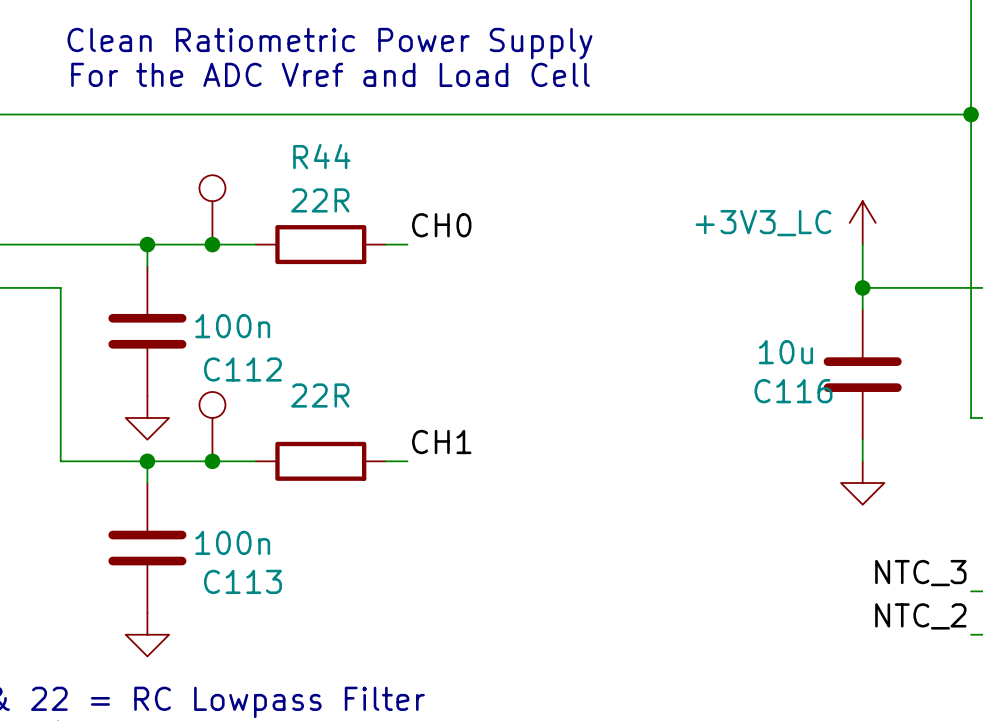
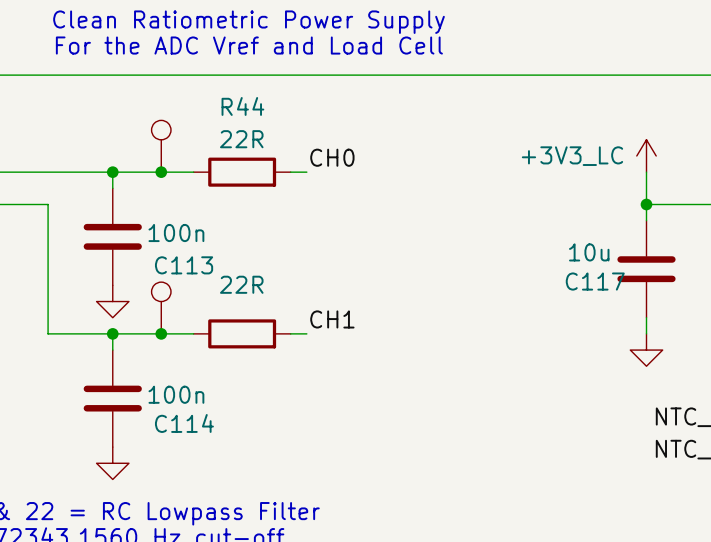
C112 name: C112 (242, 369) -> C113 (184, 265)
C116 name: C116 (793, 391) -> C117 (595, 281)
C113 name: C113 (242, 581) -> C114 (184, 423)

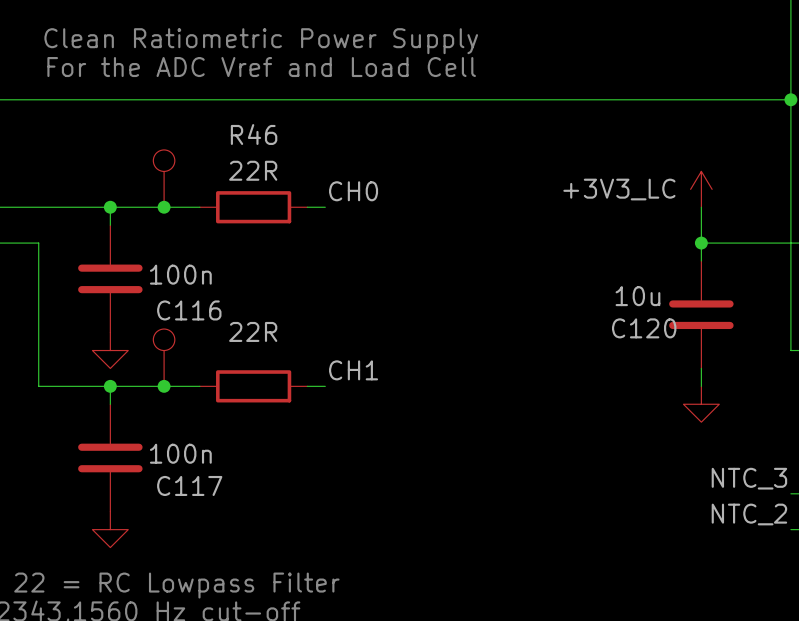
R44 name: R44 (242, 106) -> R46 (254, 134)
C113 name: C113 (184, 265) -> C116 (189, 310)
C117 name: C117 (595, 281) -> C120 (644, 328)
C114 name: C114 (184, 423) -> C117 (189, 485)

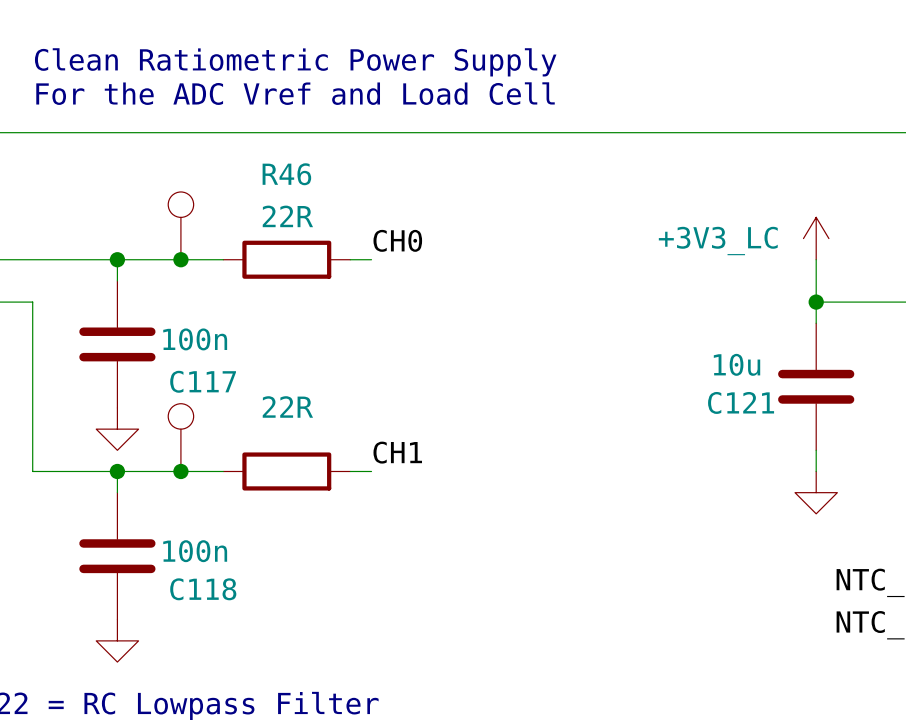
C116 name: C116 (189, 310) -> C117 (203, 381)
C120 name: C120 (644, 328) -> C121 (741, 402)
C117 name: C117 (189, 485) -> C118 (203, 589)

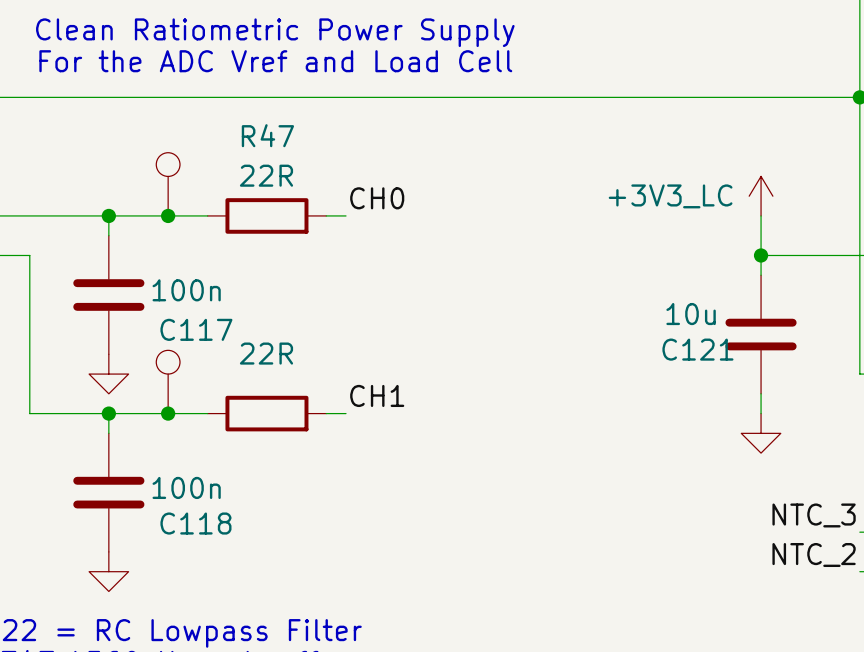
R46 name: R46 (286, 174) -> R47 (267, 135)

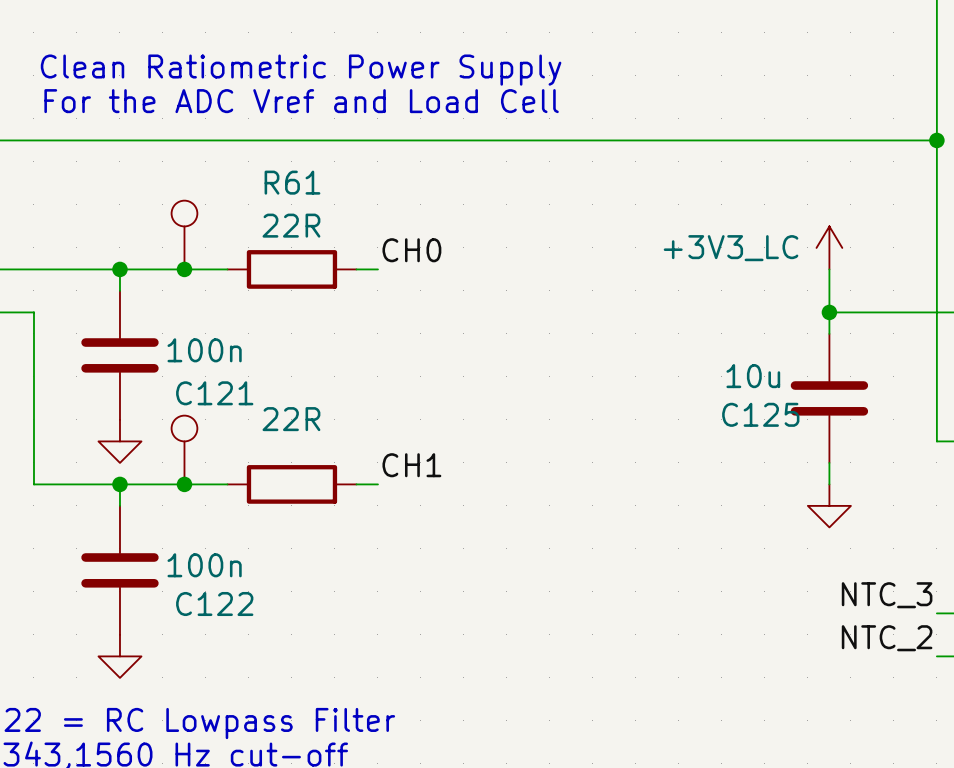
R47 name: R47 (267, 135) -> R61 (292, 182)
C117 name: C117 (196, 329) -> C121 (214, 393)
C121 name: C121 (697, 349) -> C125 (760, 414)
C118 name: C118 (195, 523) -> C122 (214, 603)

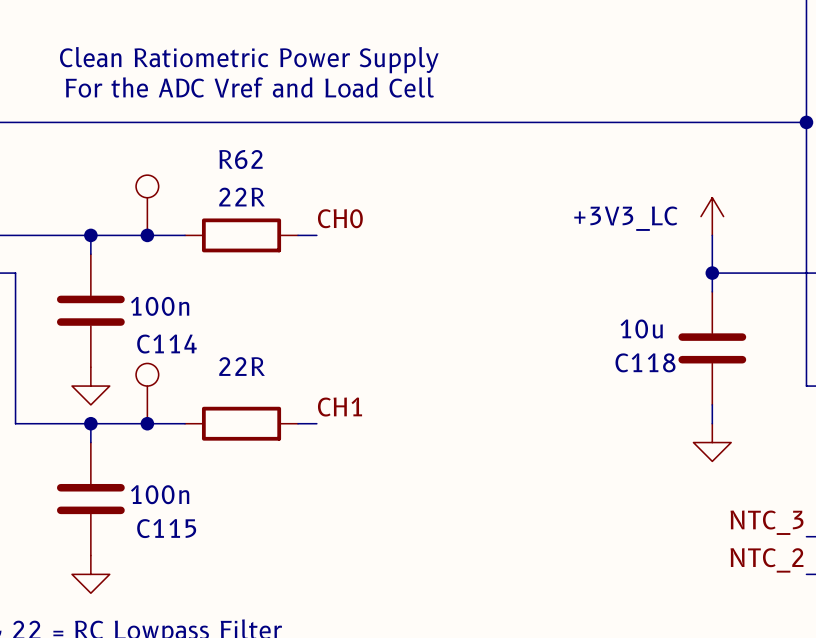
R61 name: R61 (292, 182) -> R62 (240, 159)
C121 name: C121 (214, 393) -> C114 (166, 344)
C125 name: C125 (760, 414) -> C118 (645, 362)
C122 name: C122 (214, 603) -> C115 (166, 528)

